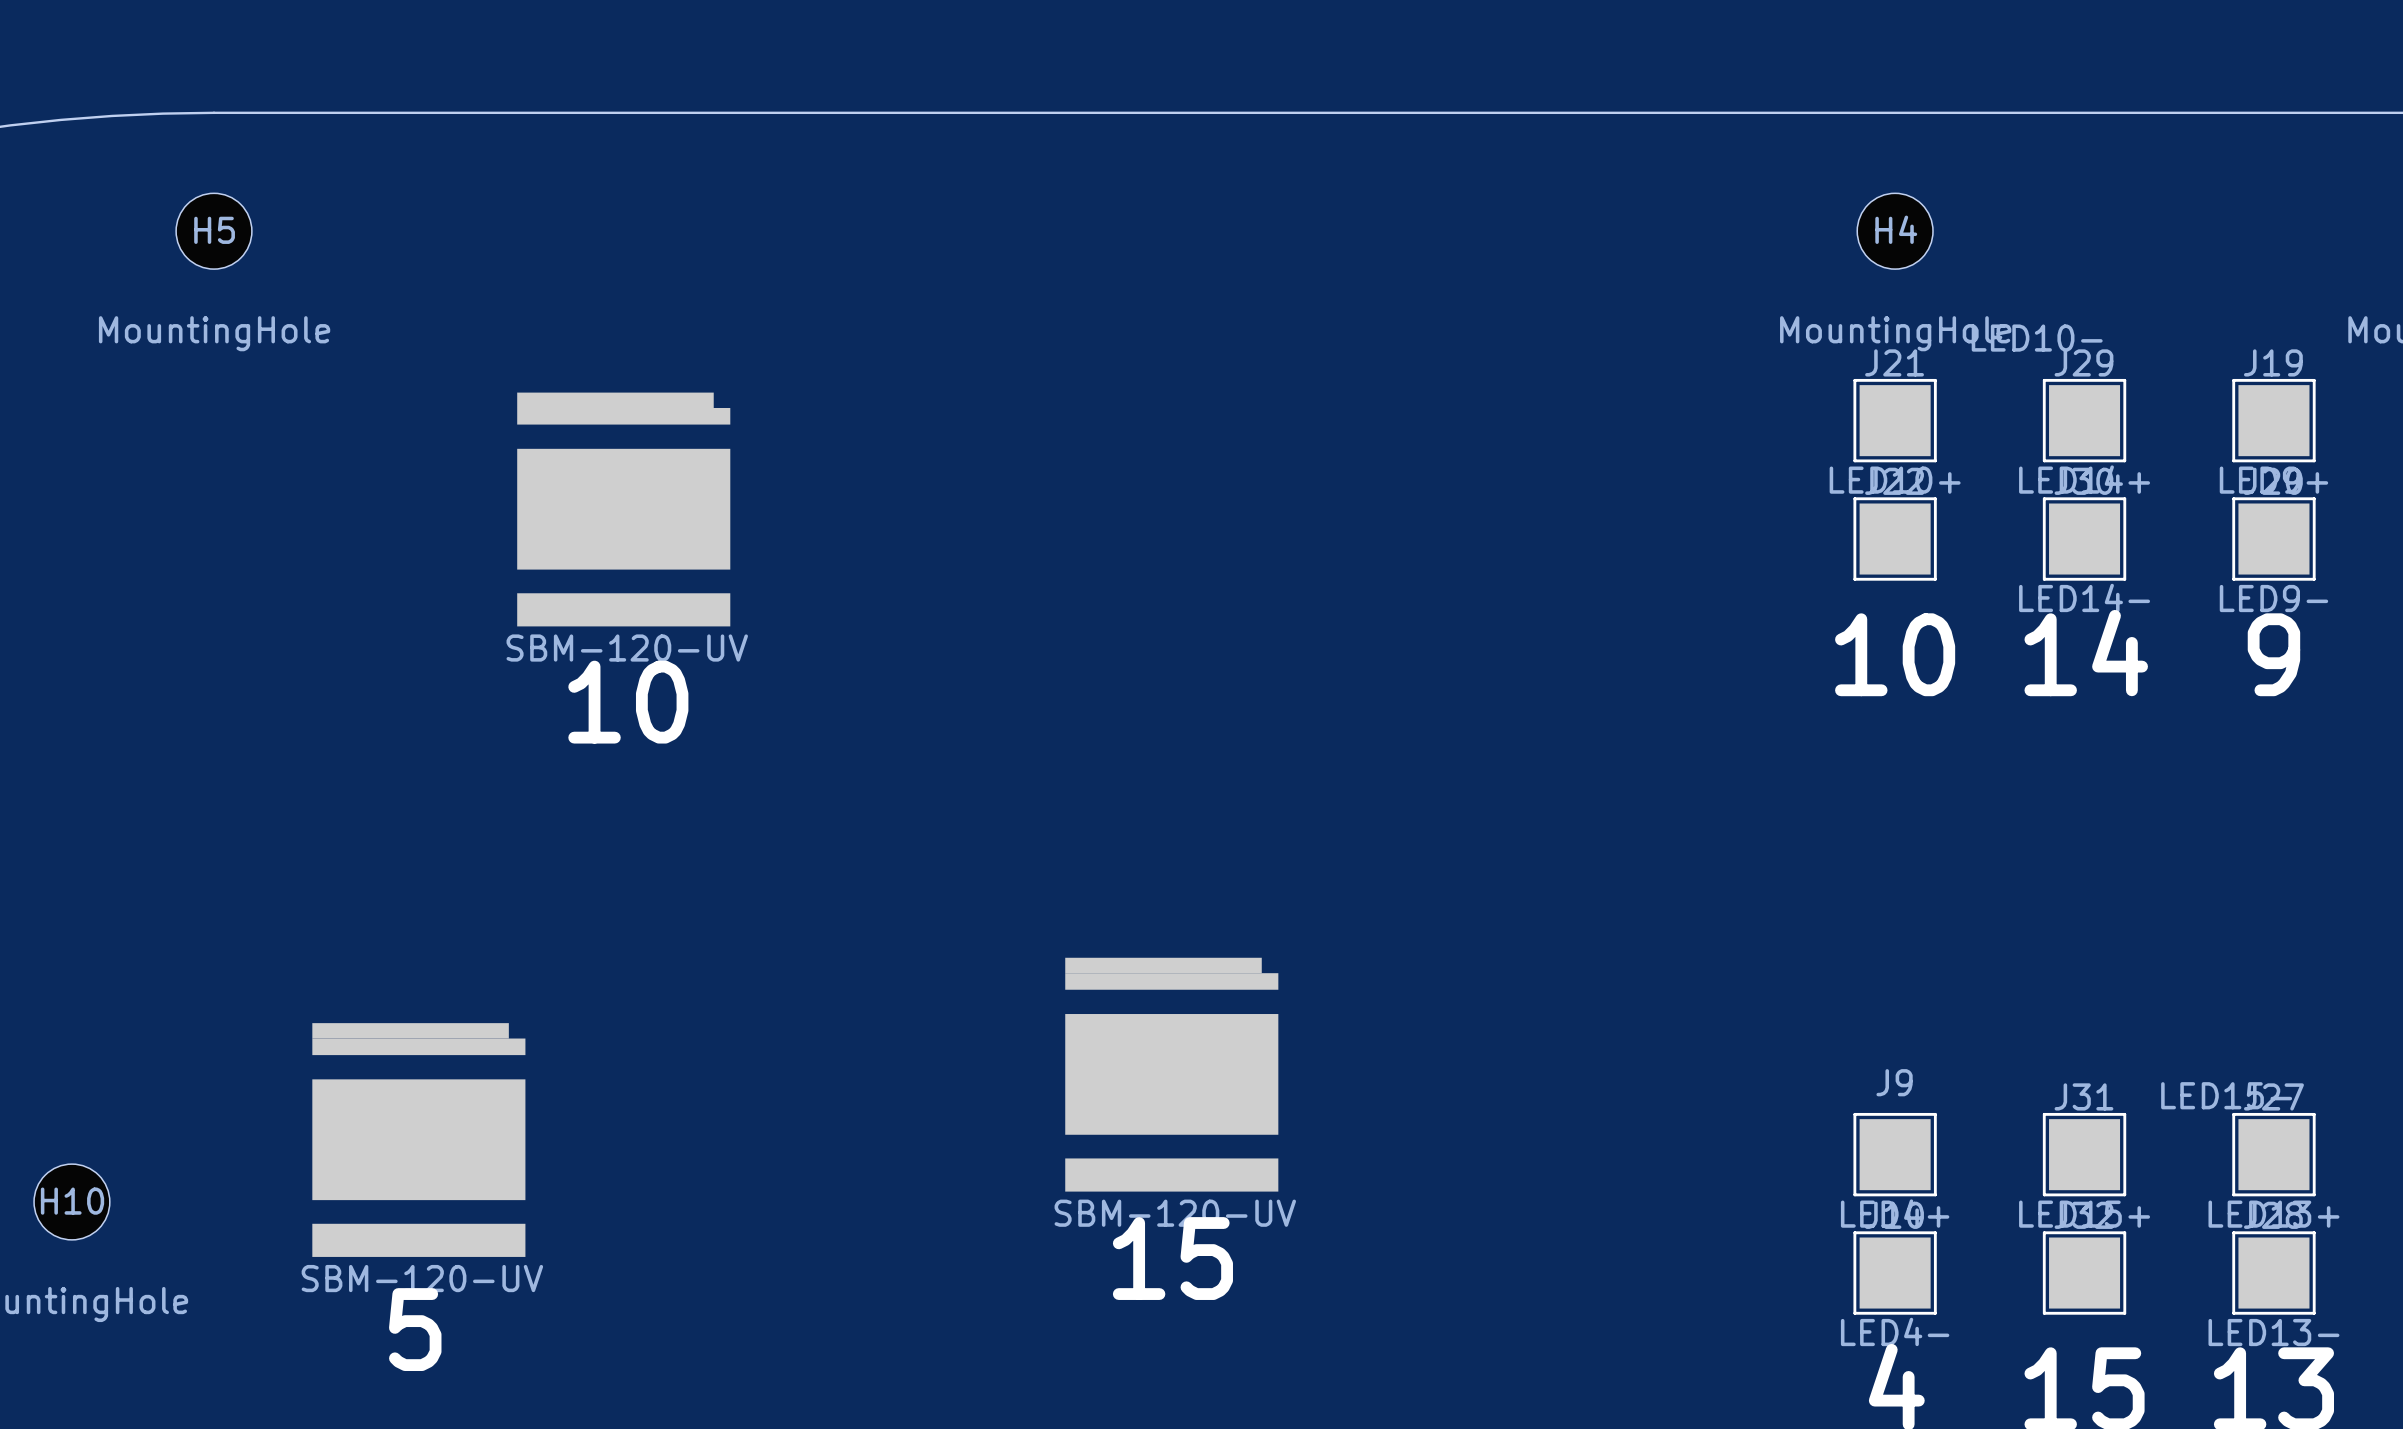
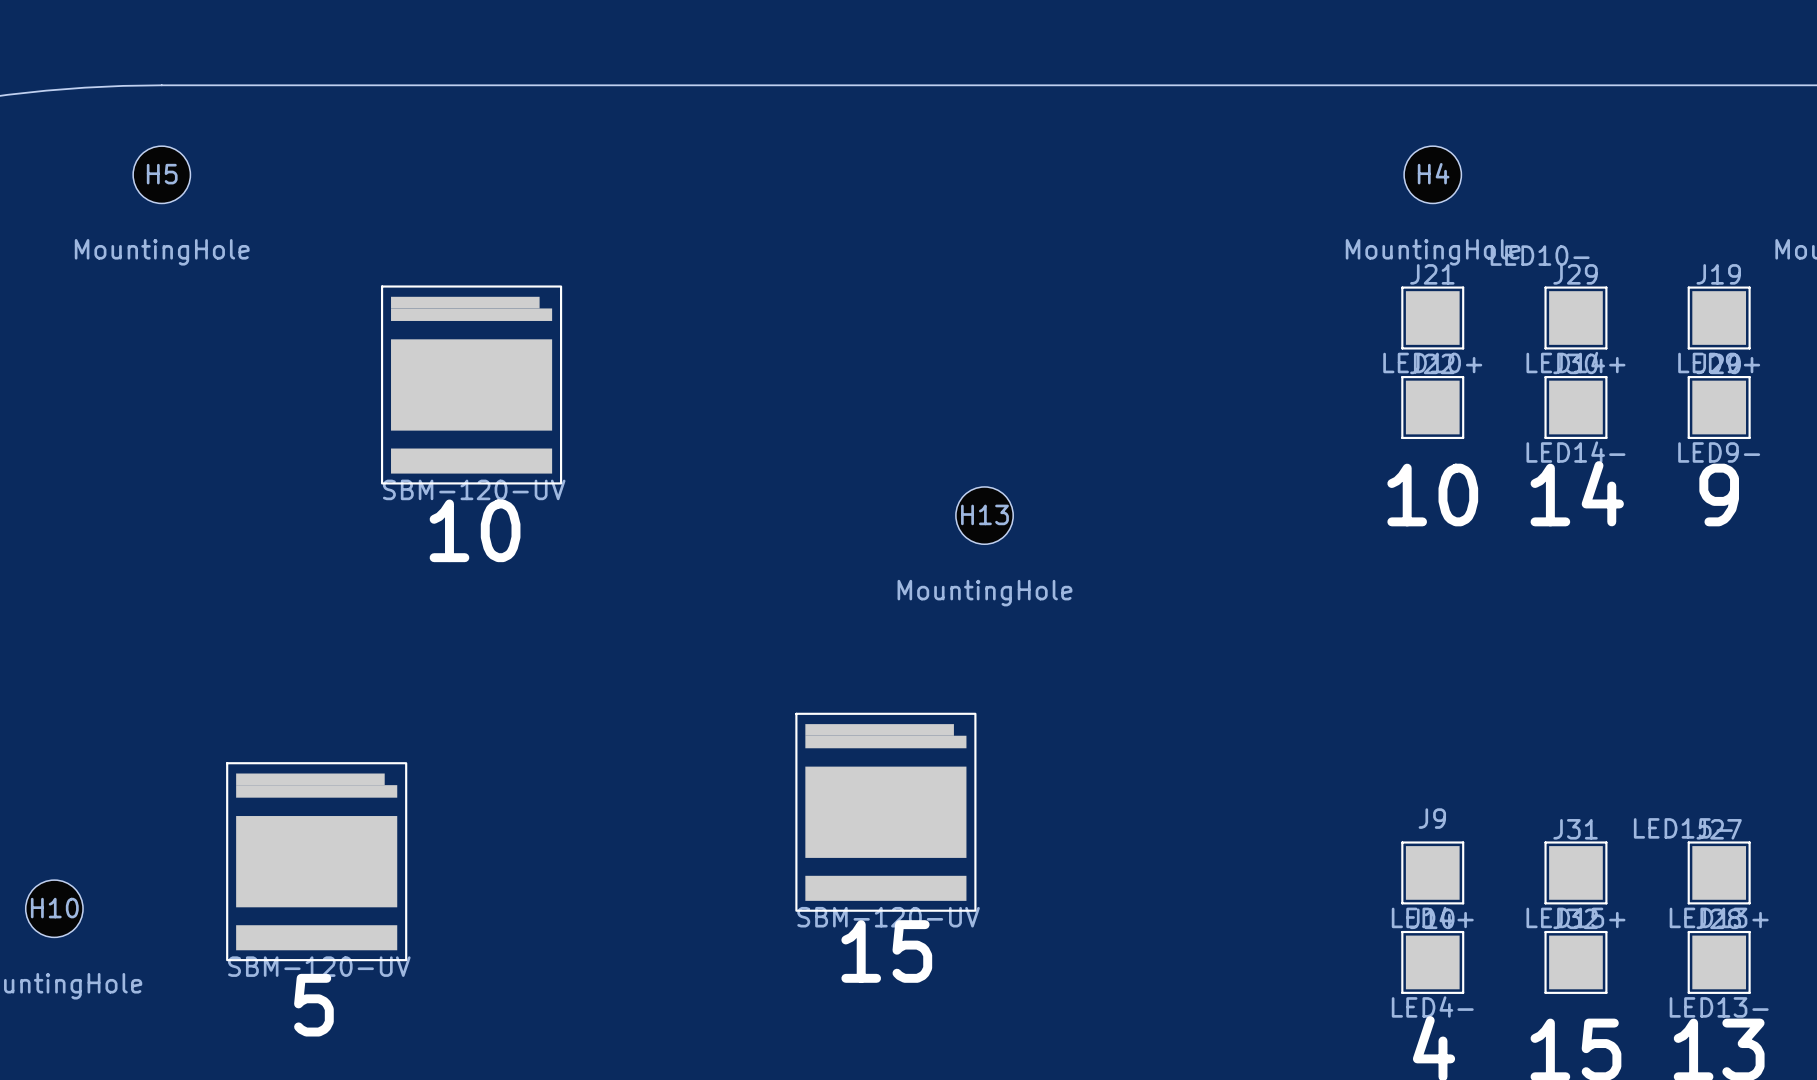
part footprint: [517, 392, 731, 627] -> [380, 285, 563, 485]
H13: none -> MountingHole (984, 515)
part footprint: [1065, 957, 1279, 1192] -> [795, 712, 977, 912]
part footprint: [312, 1023, 526, 1257] -> [226, 762, 408, 962]

